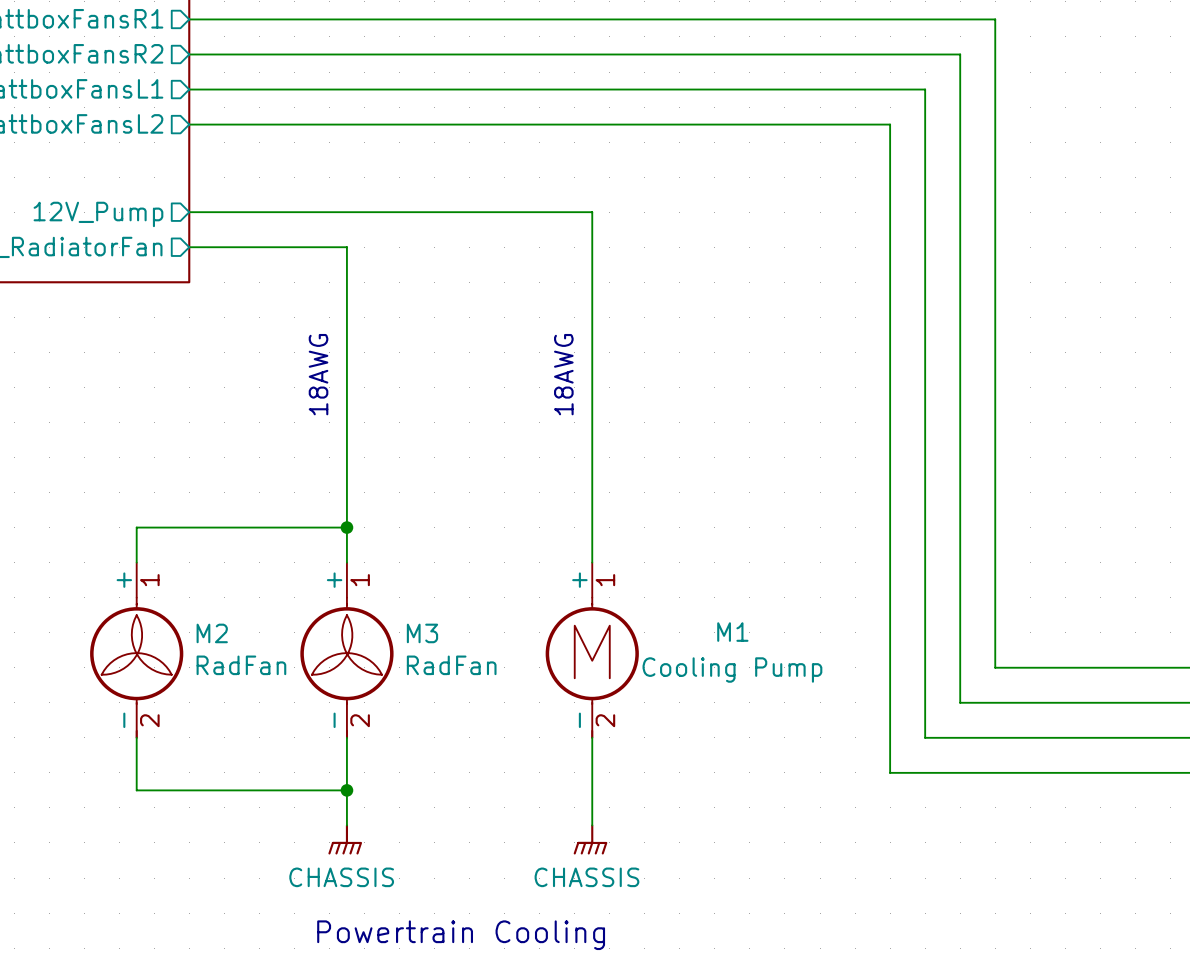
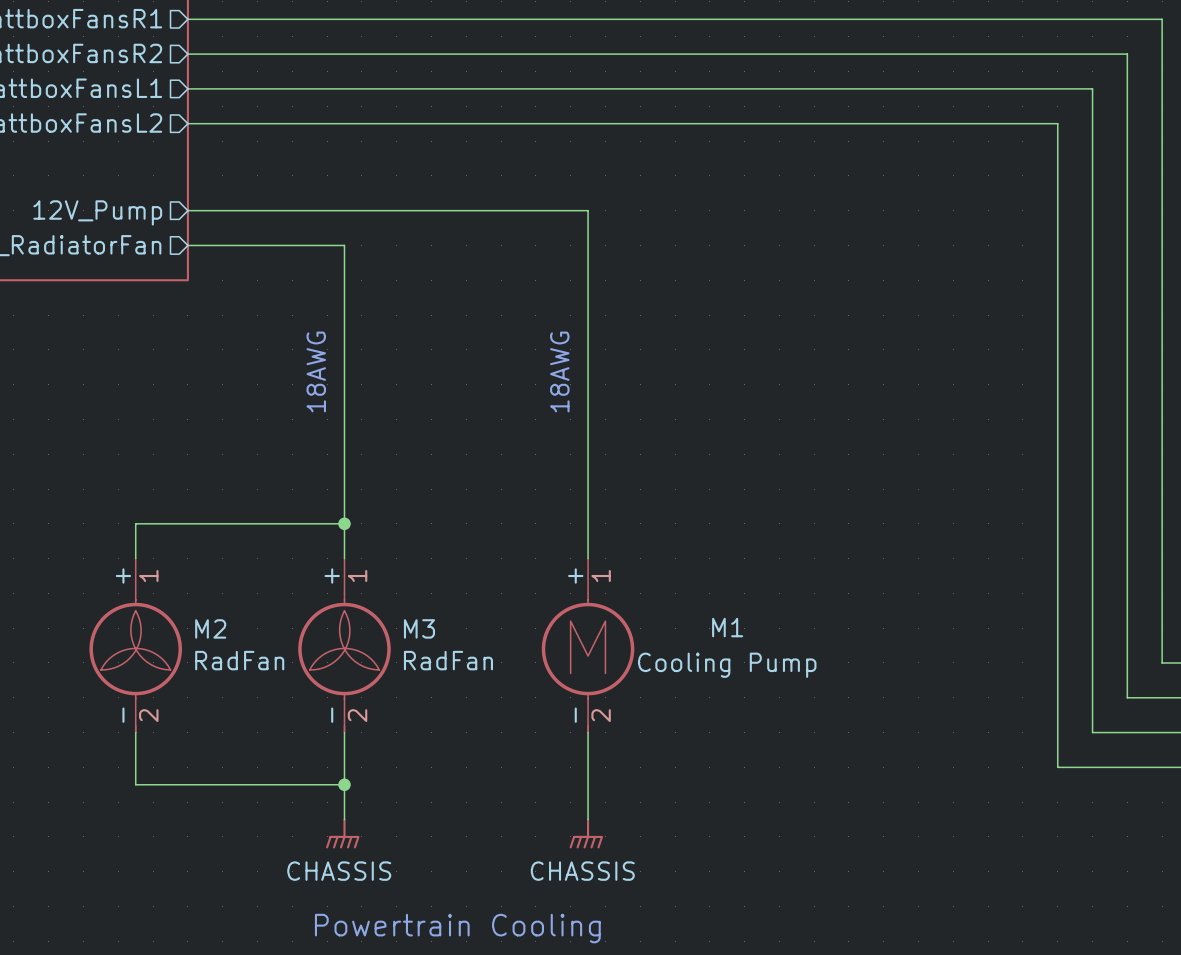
wire: (995, 19) (995, 667) (1170, 667) -> (988, 19) (1162, 19) (1162, 662)
wire: (960, 54) (960, 702) (1135, 702) -> (953, 54) (1127, 54) (1127, 697)
wire: (925, 89) (925, 737) (1100, 737) -> (918, 88) (1092, 88) (1092, 732)
wire: (890, 124) (890, 772) (1065, 772) -> (883, 123) (1057, 123) (1057, 767)

